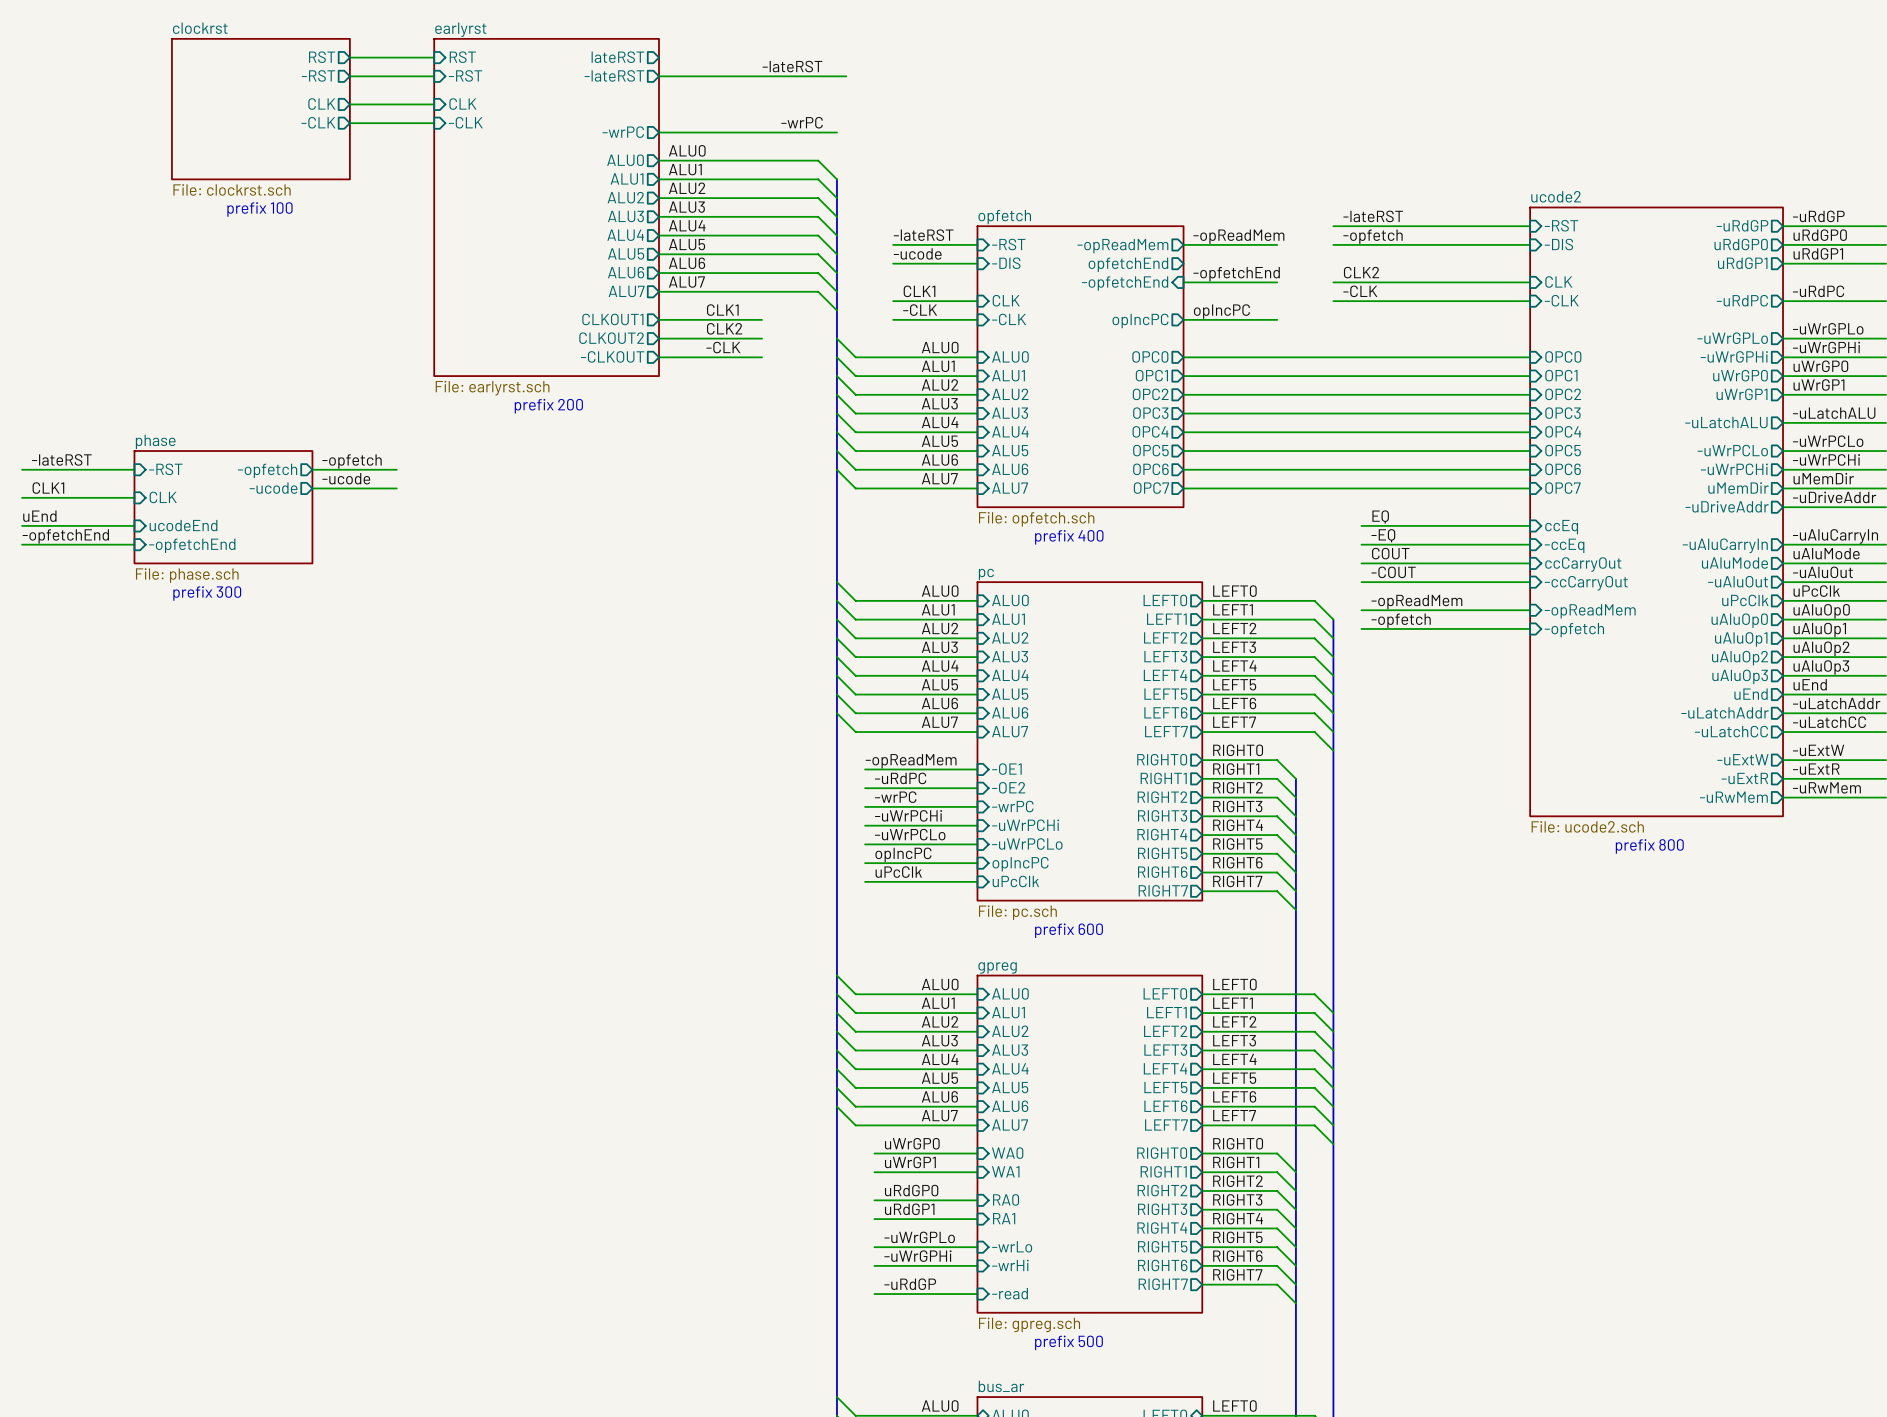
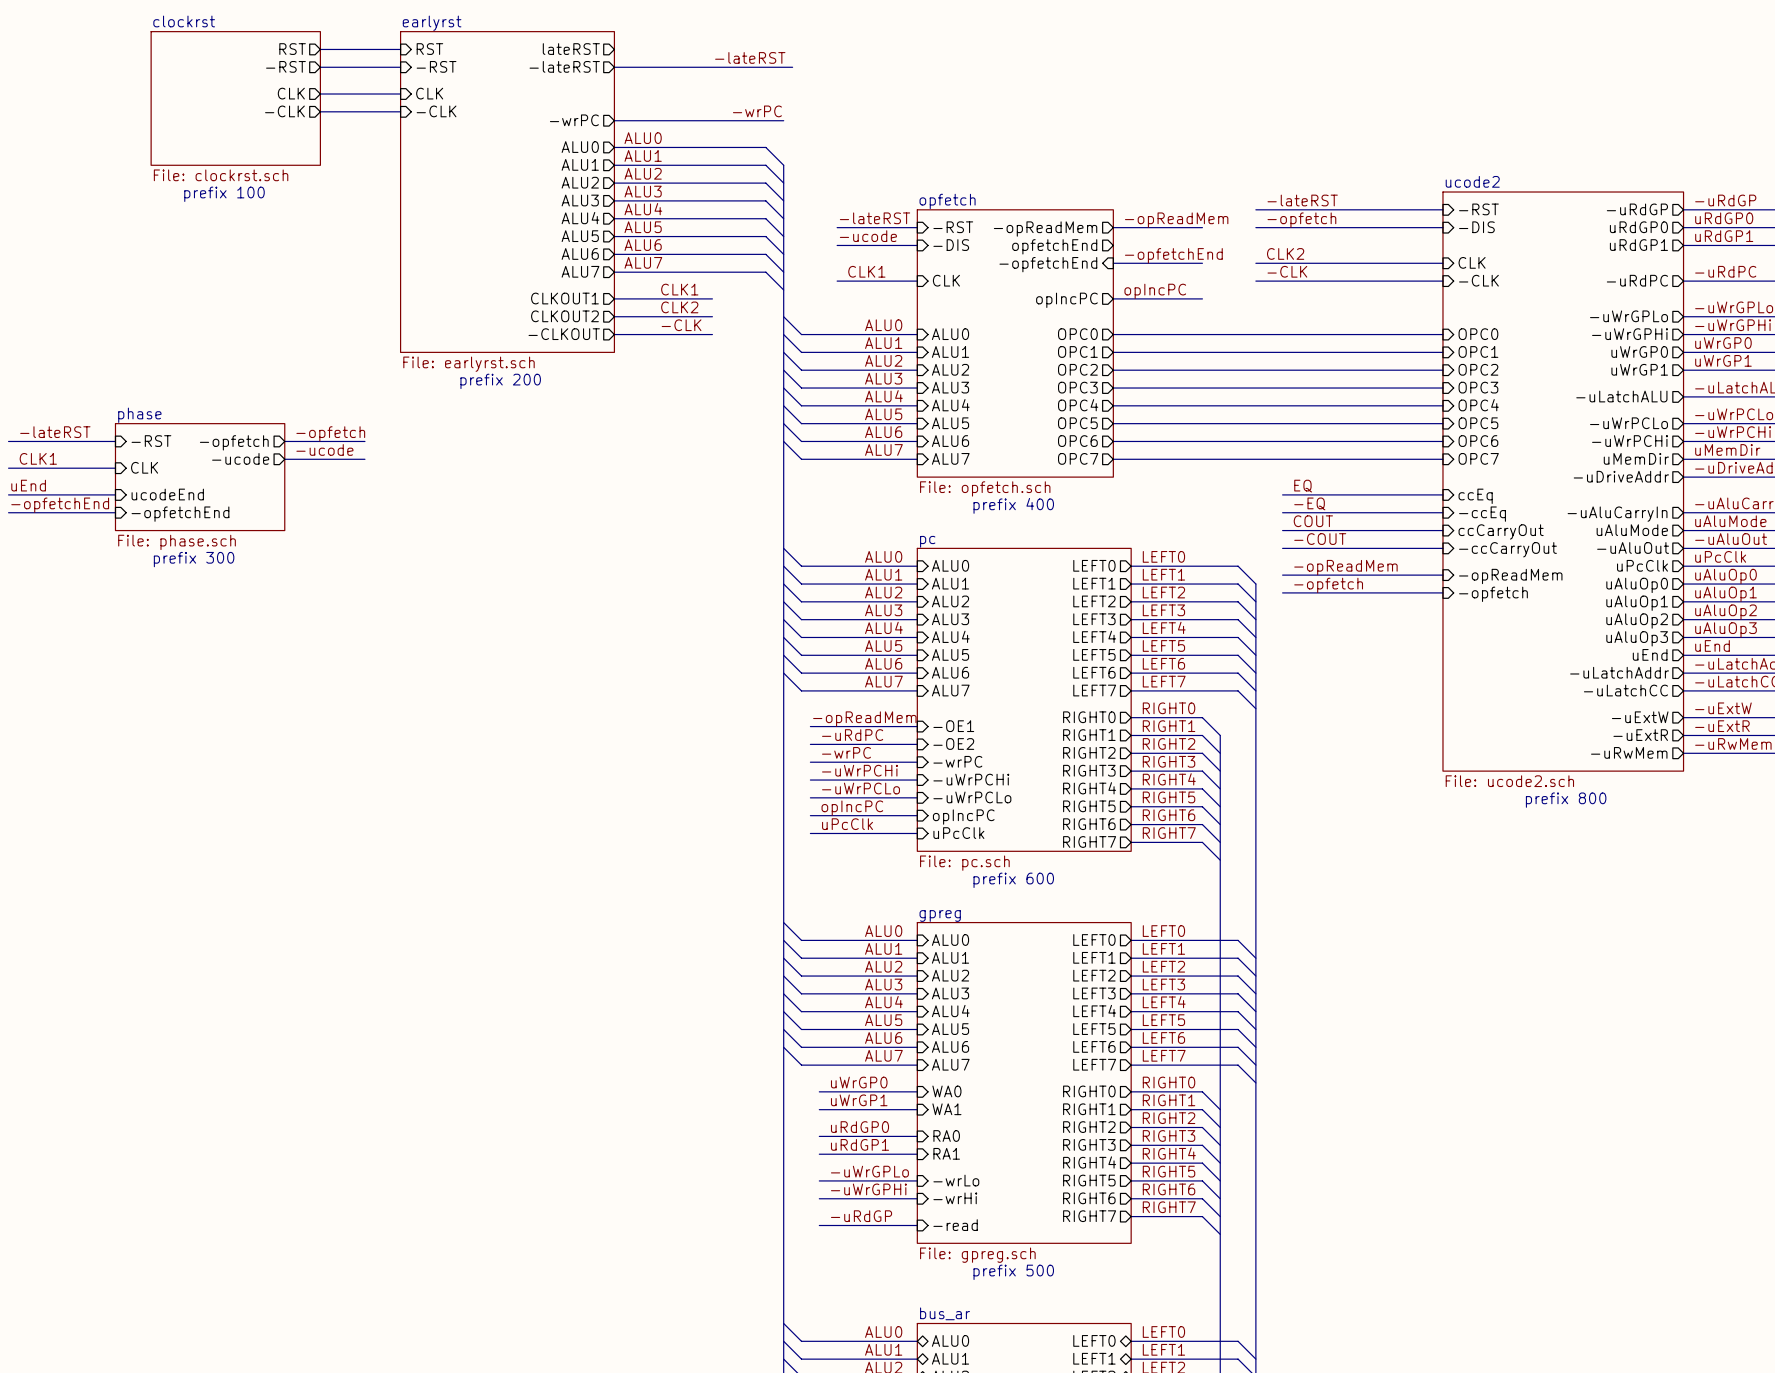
label: -CLK (920, 310) -> none
wire: (893, 319) (977, 319) -> none
sheet pin: -CLK (1009, 319) -> none

